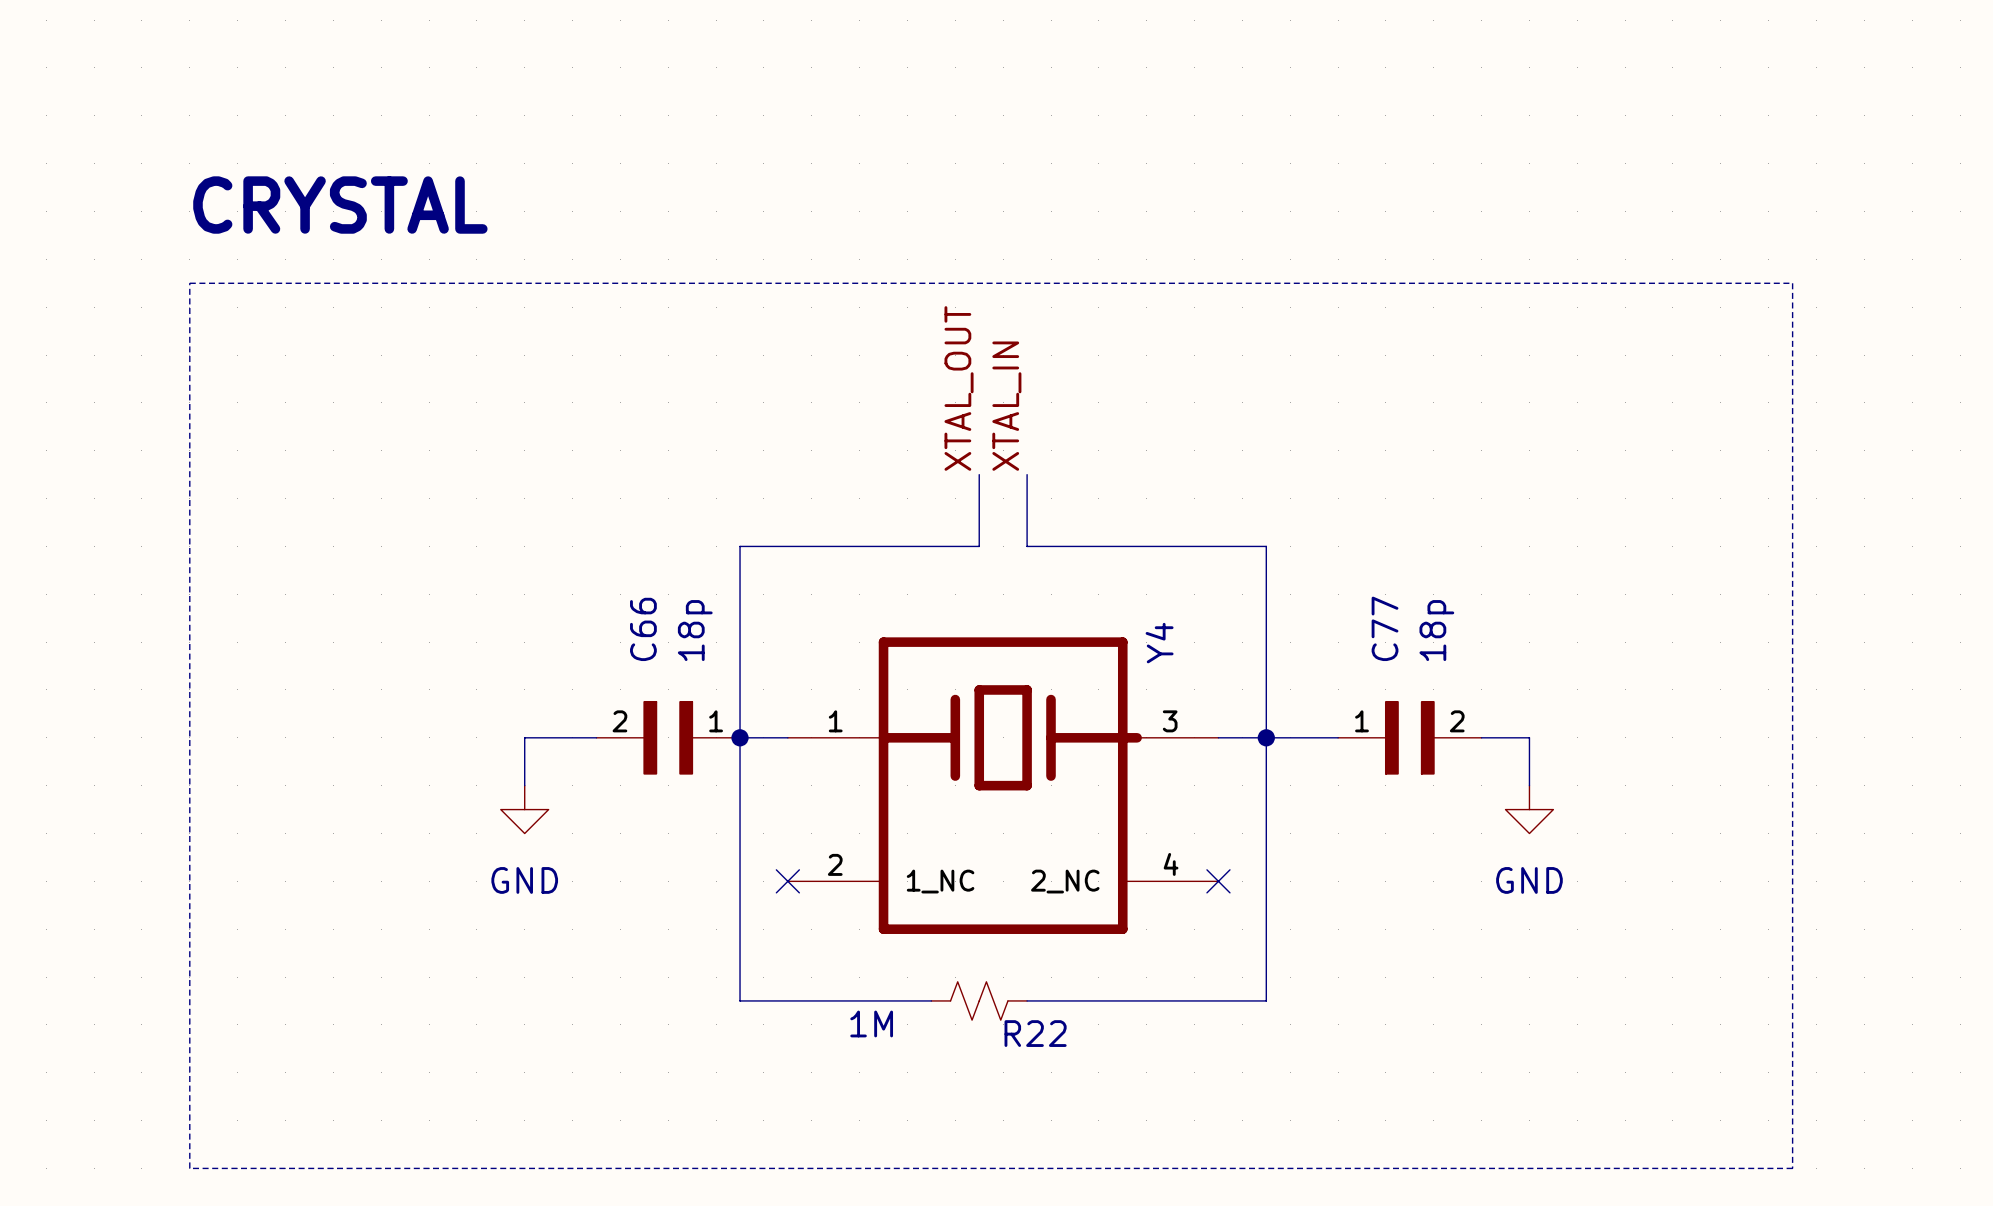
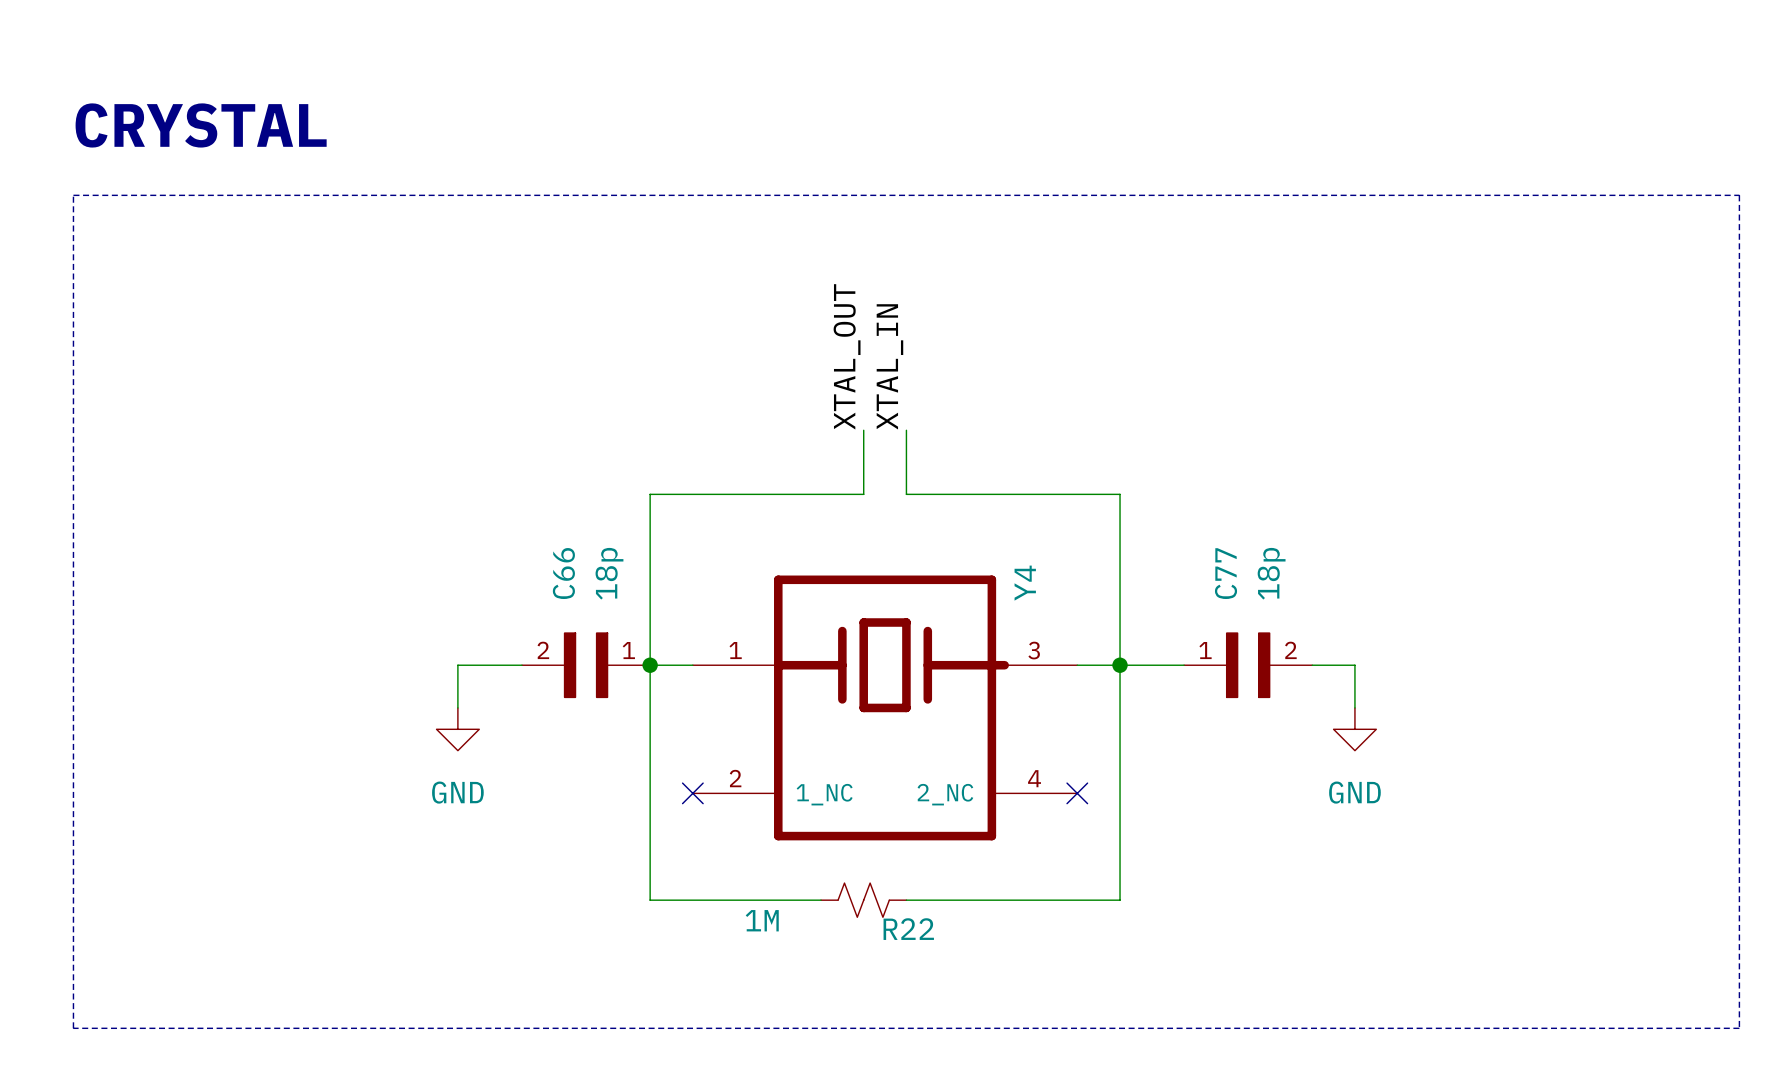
text position: CRYSTAL (340, 205) -> CRYSTAL (201, 125)
line: (189, 283) (1792, 283) (1792, 1168) (189, 1168) (189, 283) -> (73, 195) (73, 1028) (1739, 1028) (1739, 195) (73, 195)

